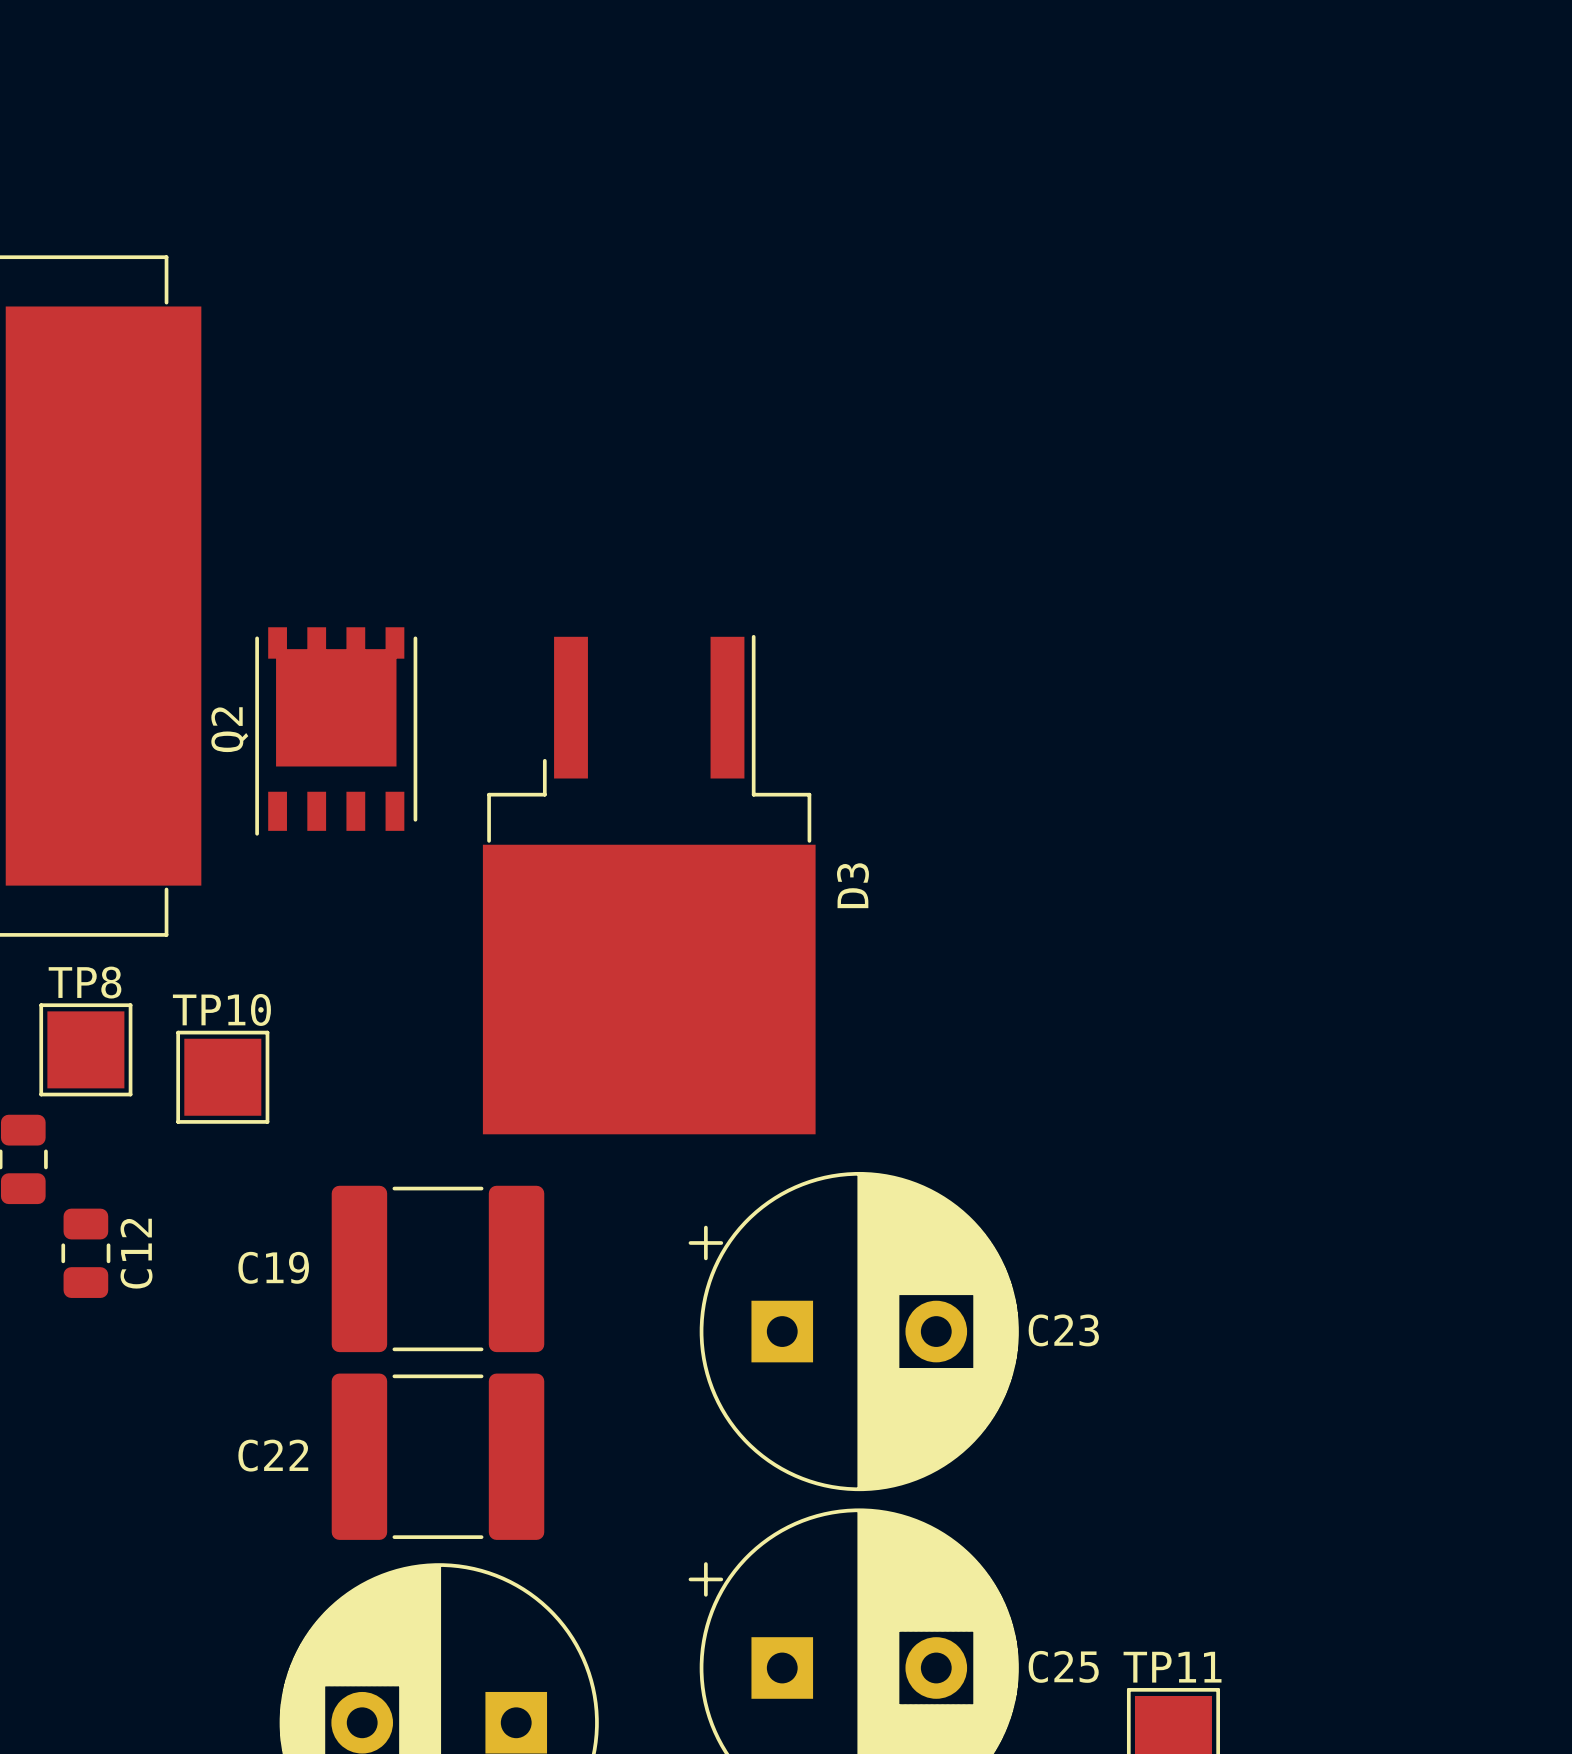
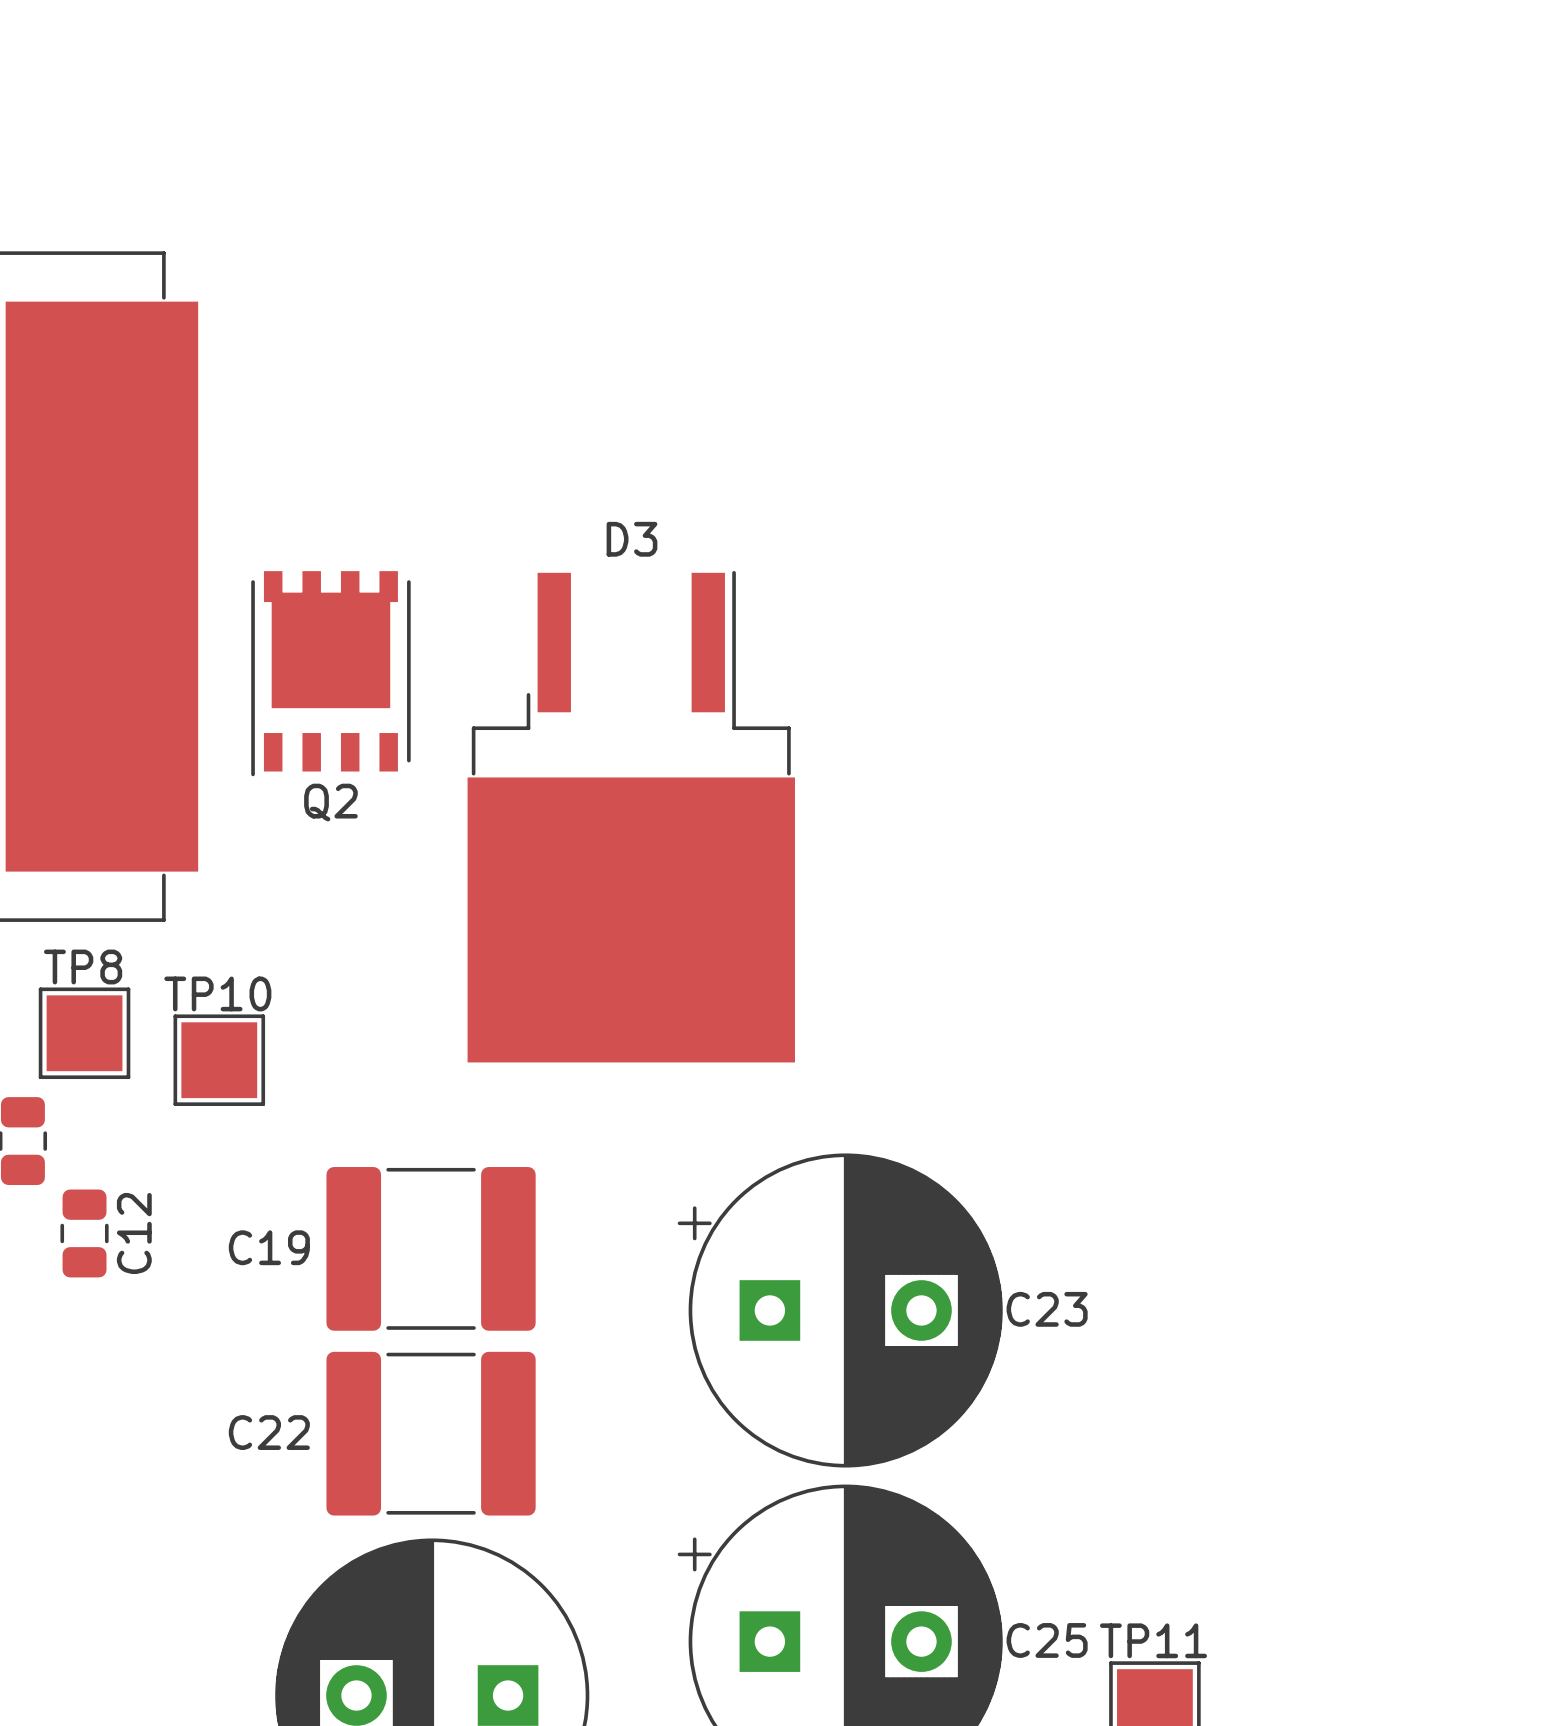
Q2 name rotation: 0° (229, 729) -> 90° clockwise (330, 802)
Q2 name position: Q2 (229, 729) -> Q2 (330, 802)
Q2 position: (336, 731) -> (330, 673)
D3 position: (649, 884) -> (631, 816)
D3 name rotation: 0° (852, 885) -> 90° clockwise (631, 539)
D3 name position: D3 (852, 885) -> D3 (631, 539)

